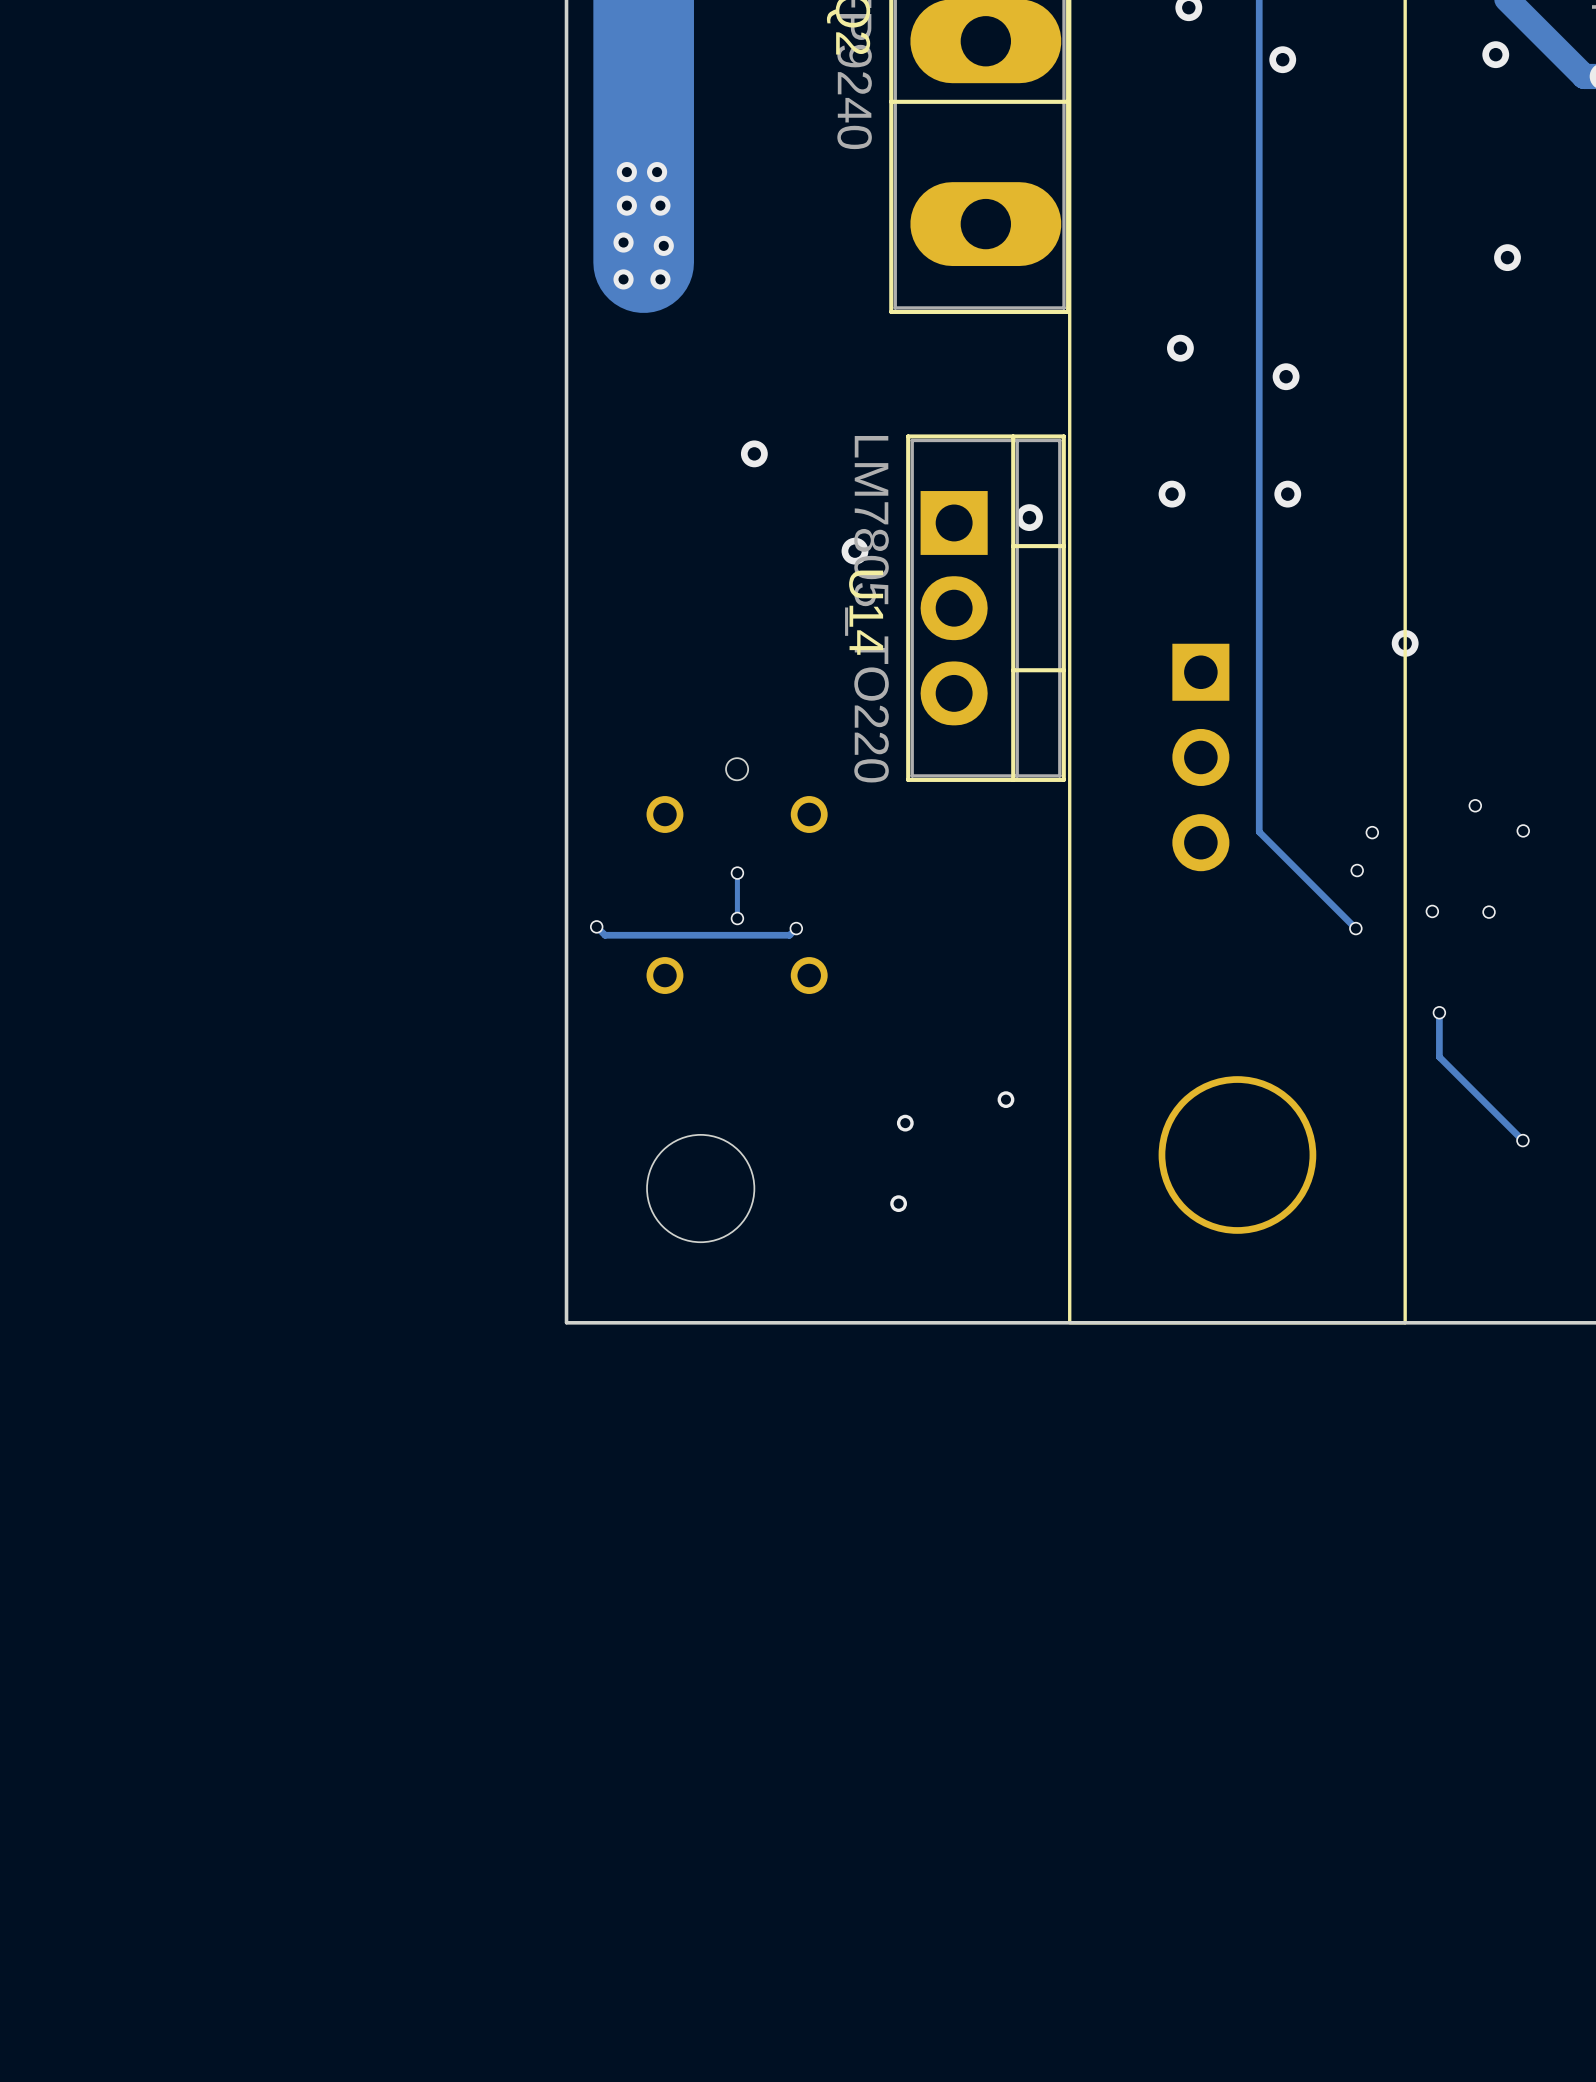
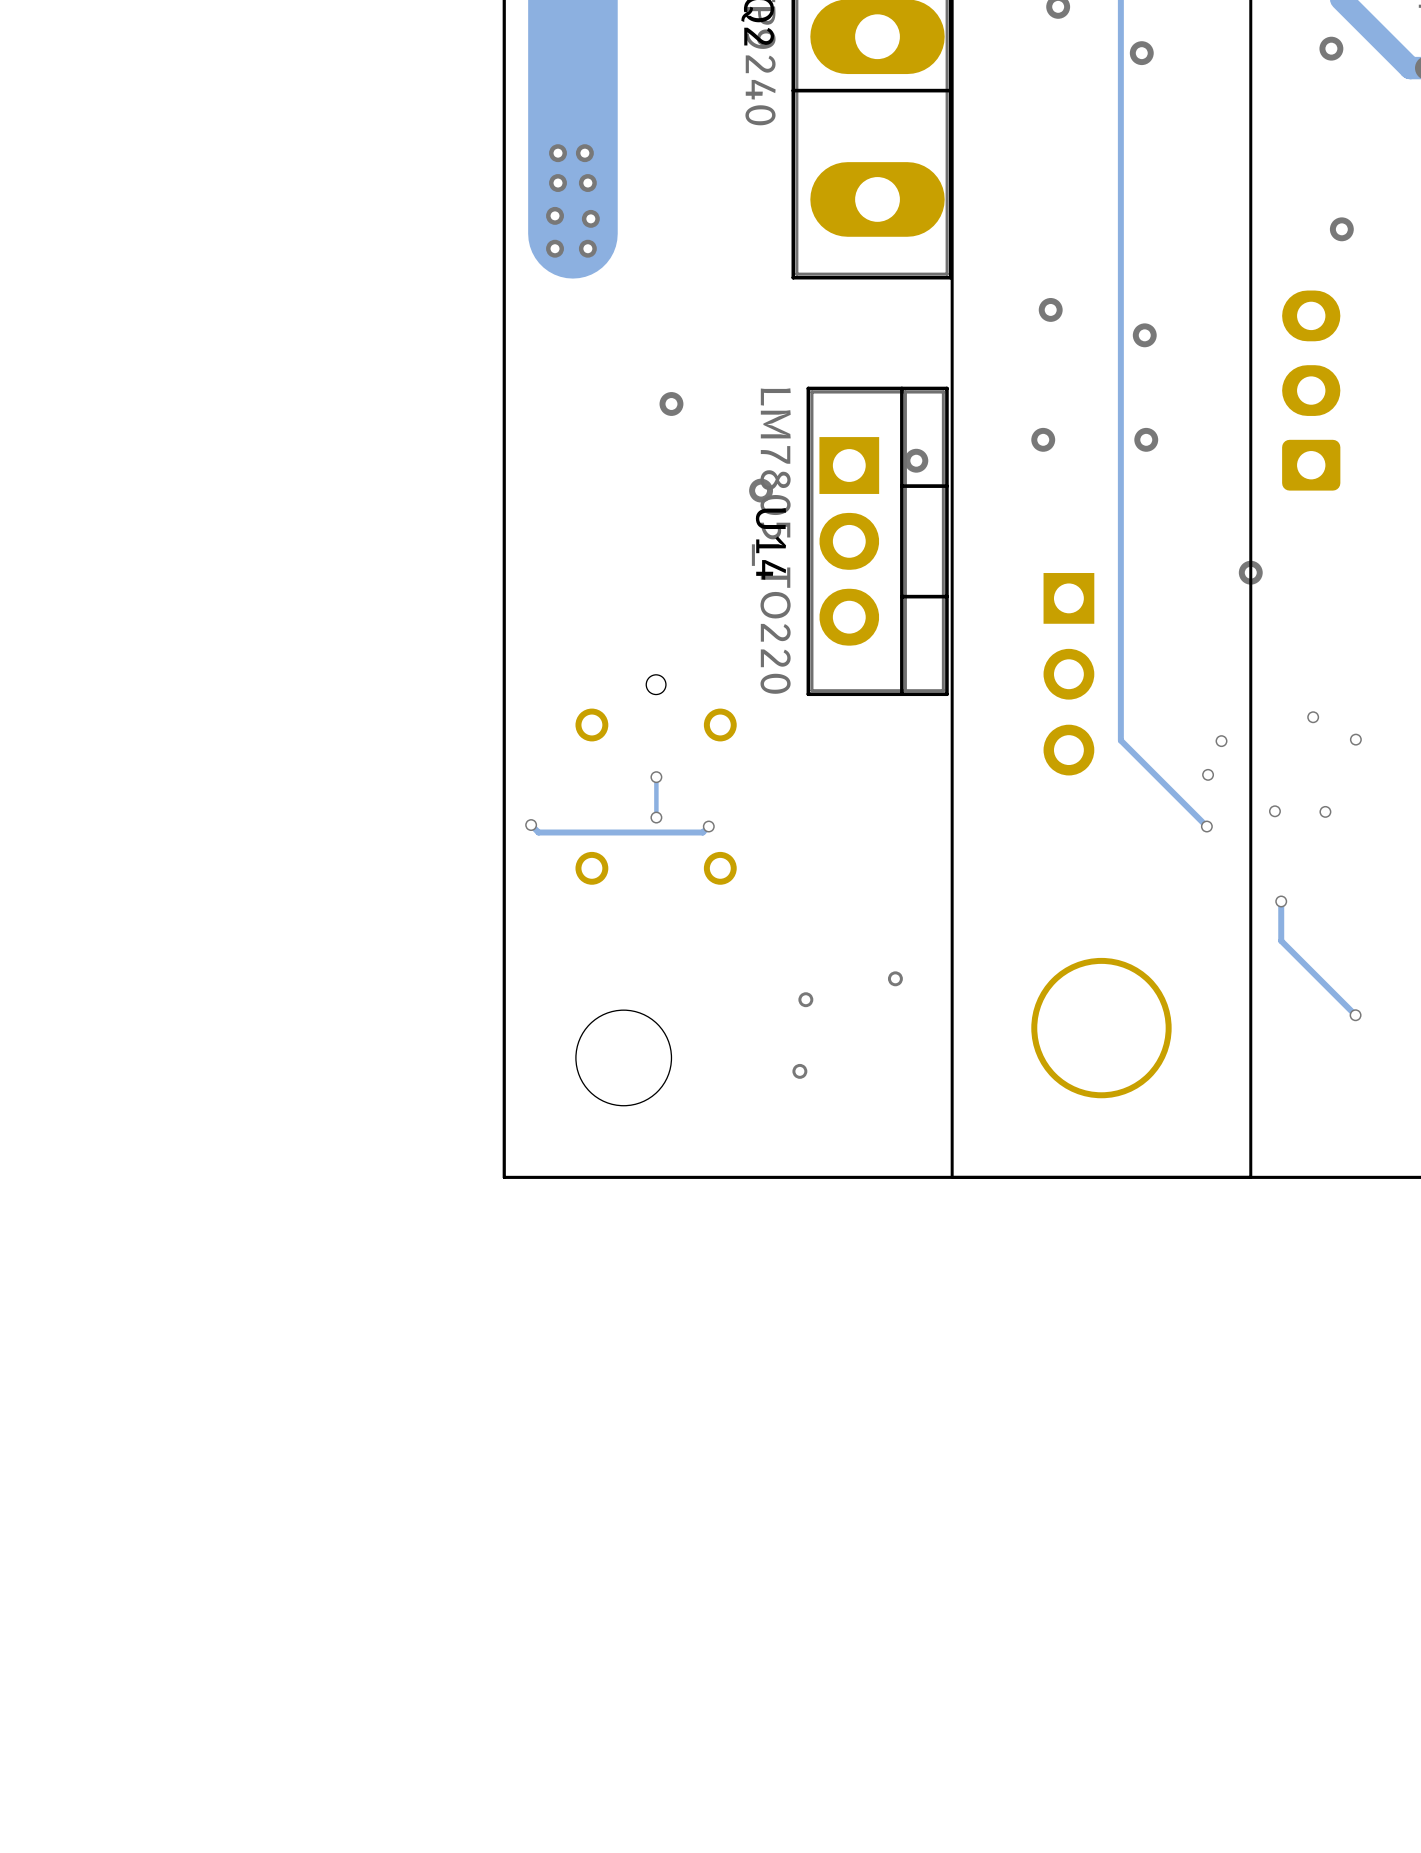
part: none -> (1311, 390)

